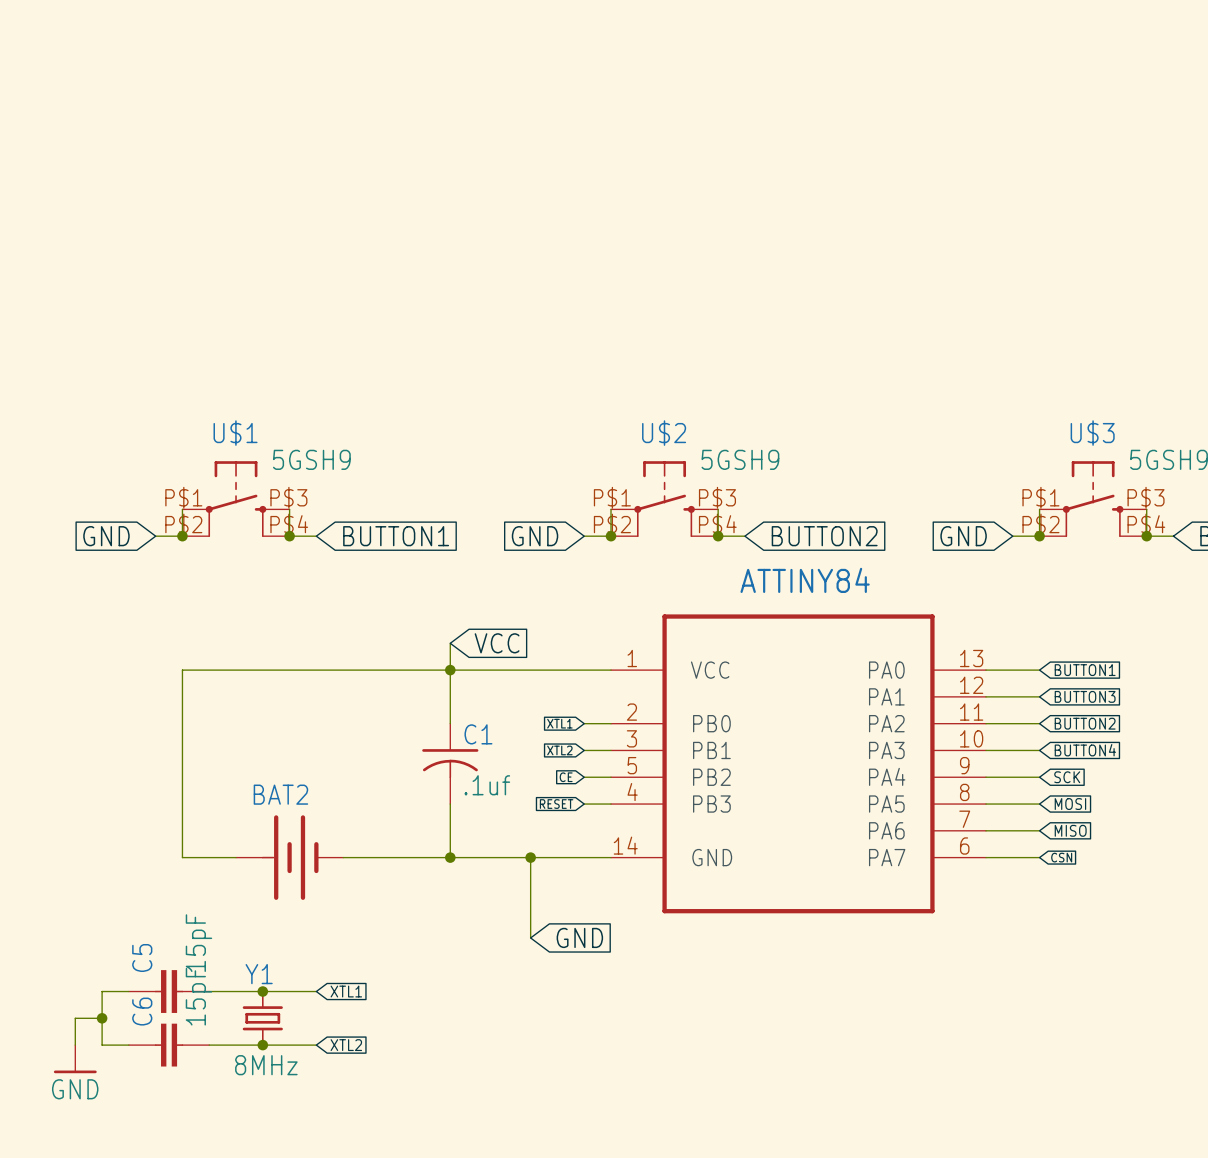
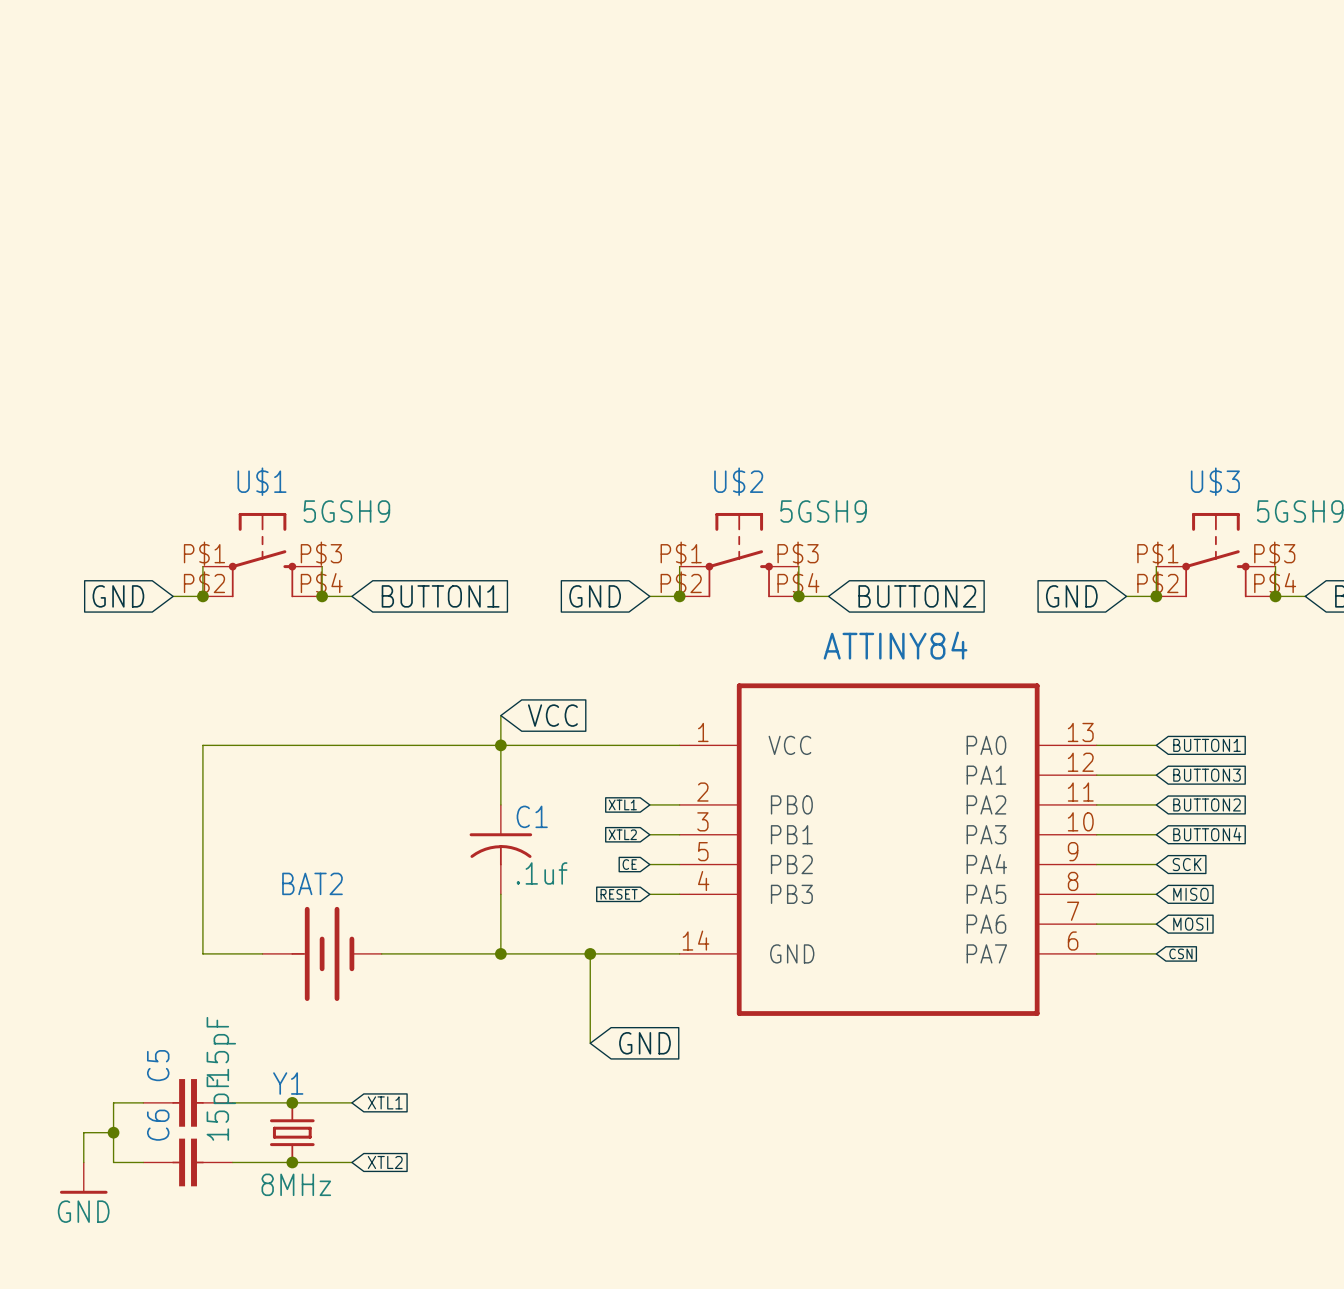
global label: MOSI (1070, 804) -> MISO (1190, 894)
global label: MISO (1070, 830) -> MOSI (1190, 924)

